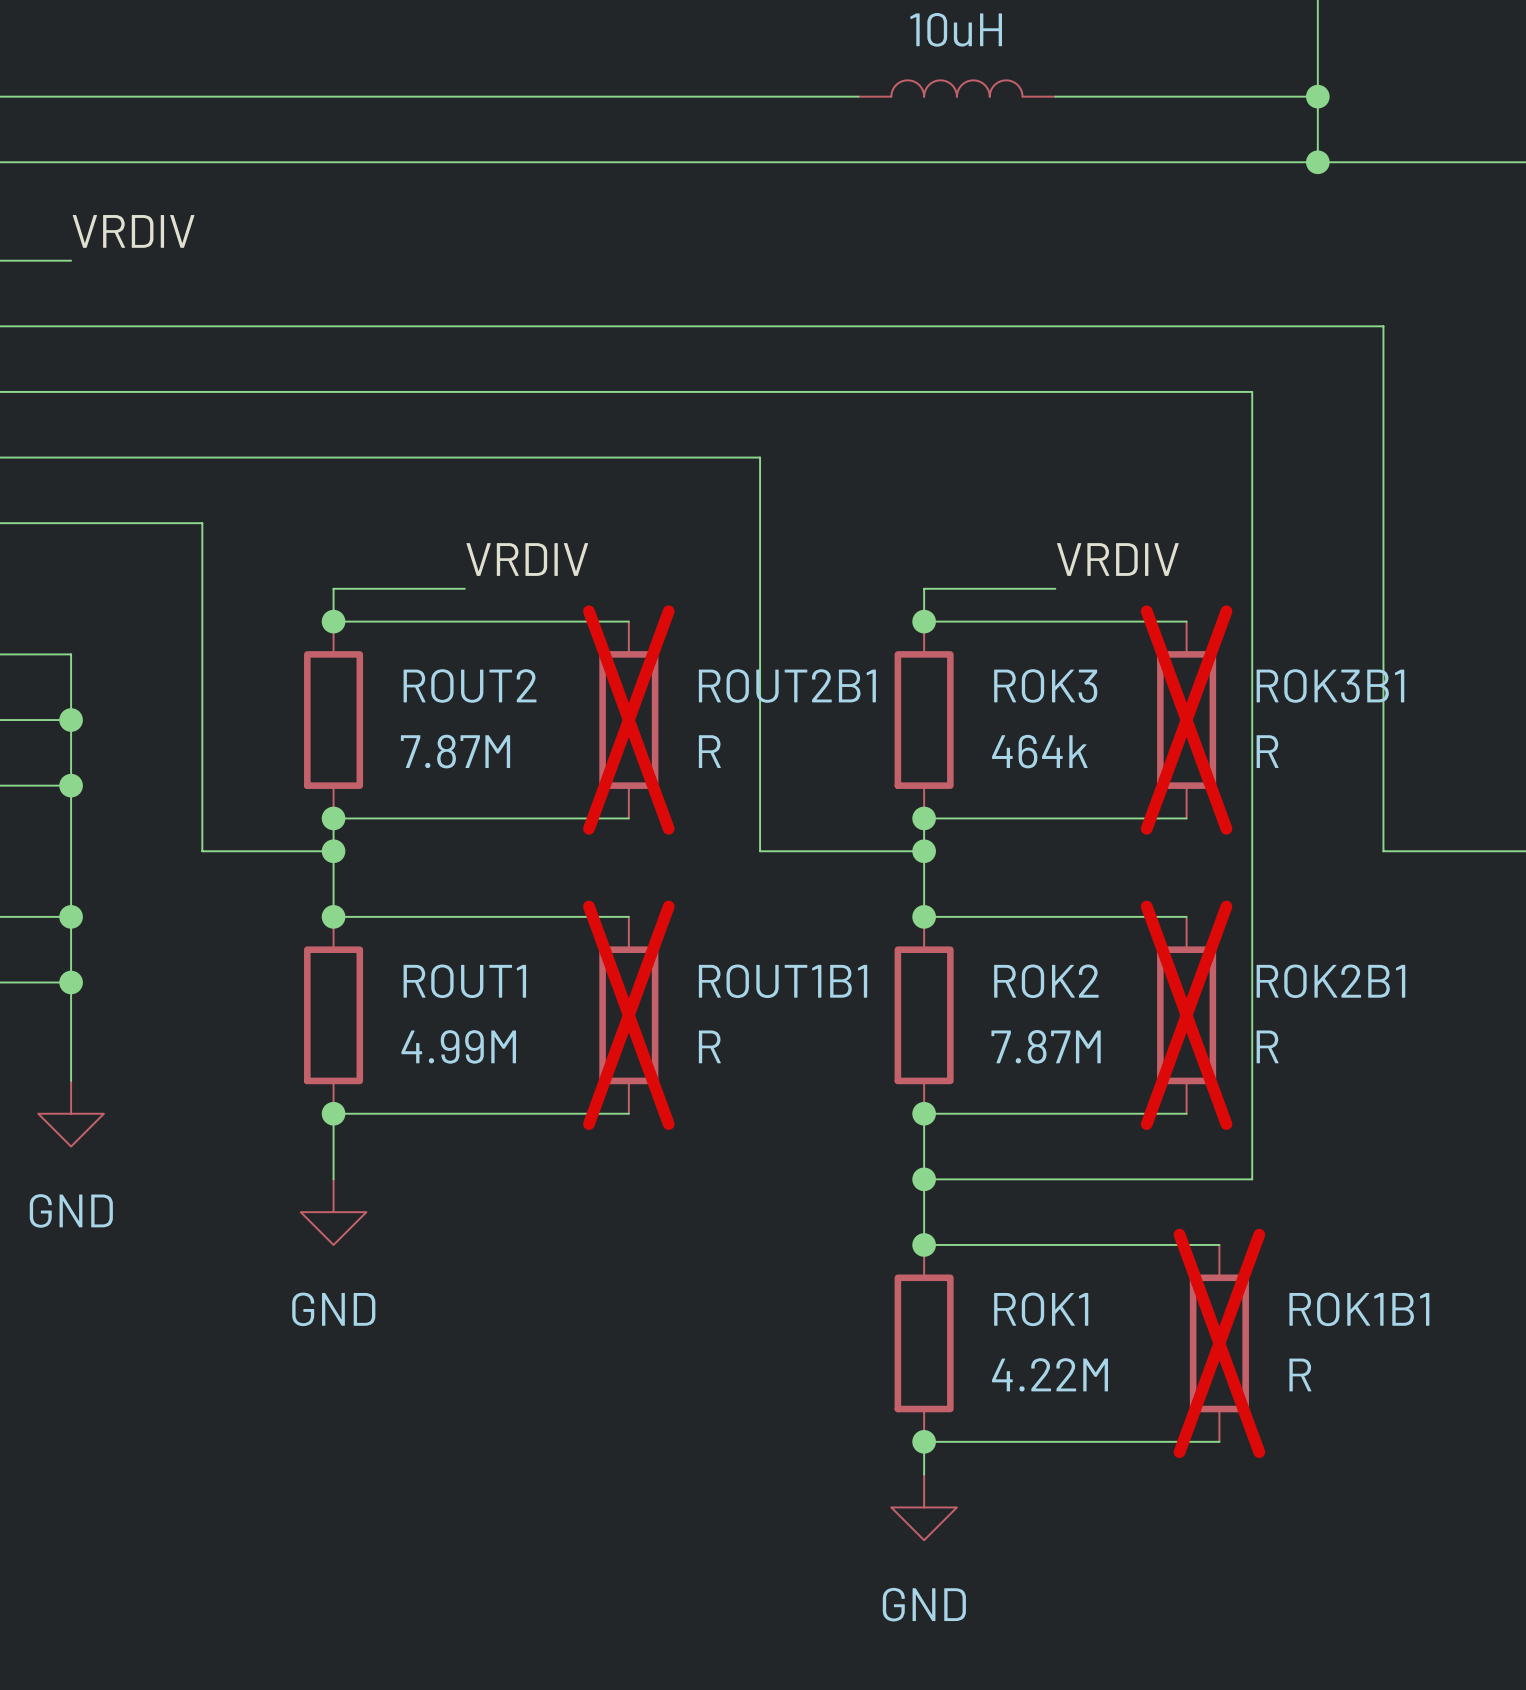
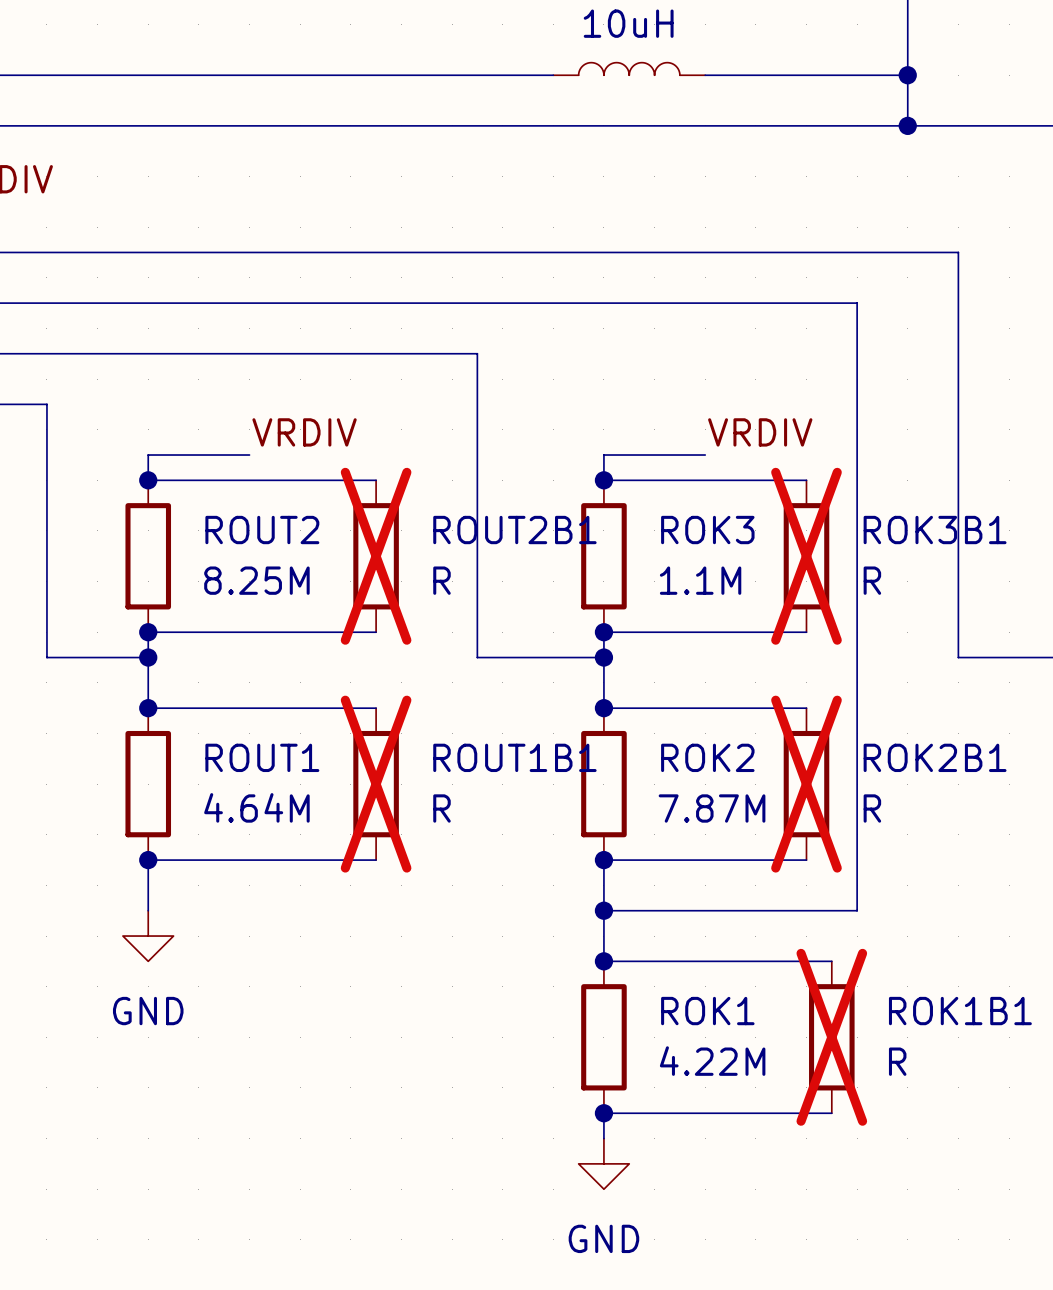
ROUT2 value: 7.87M (455, 751) -> 8.25M (256, 580)
ROK3 value: 464k (1039, 751) -> 1.1M (700, 580)
ROUT1 value: 4.99M (458, 1046) -> 4.64M (256, 807)

